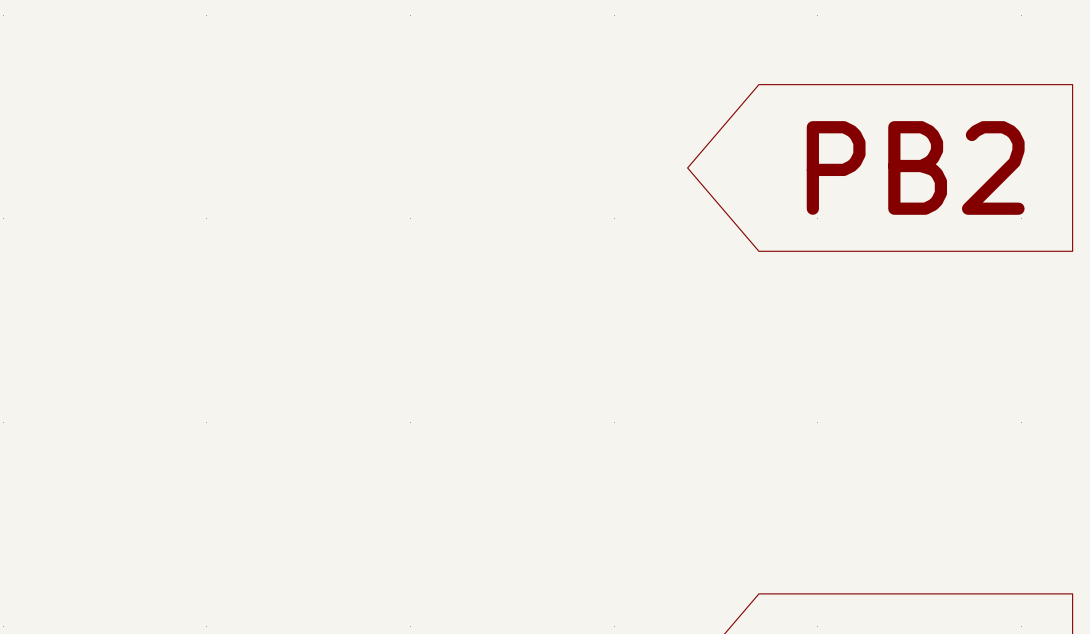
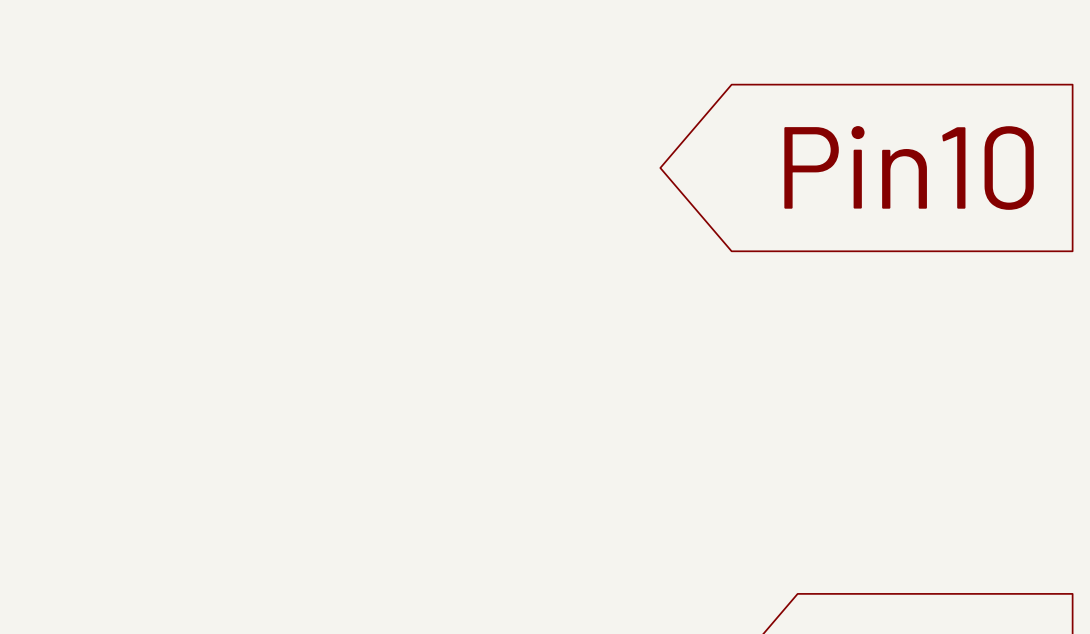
global label: PB2 (915, 167) -> Pin10 (909, 167)

